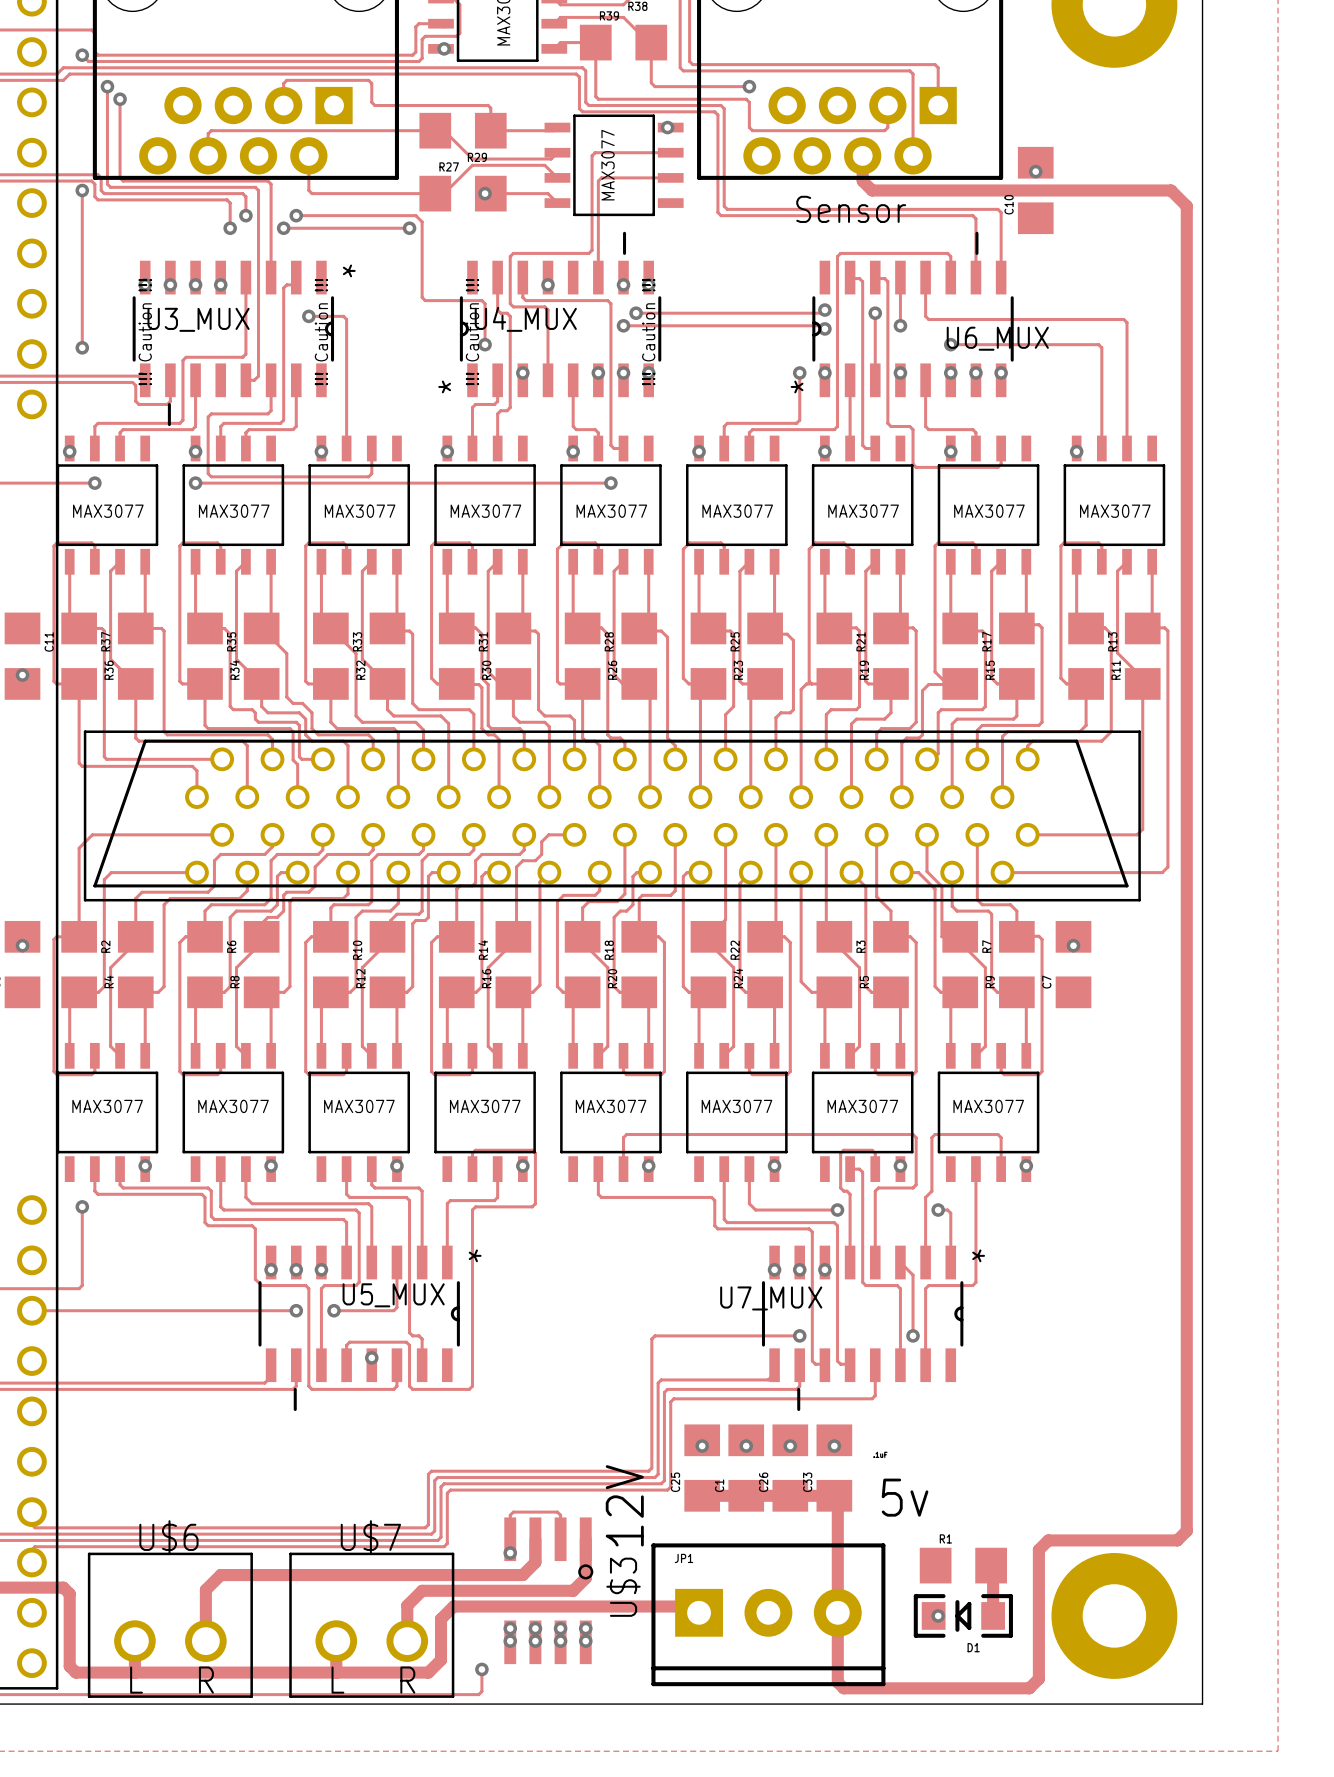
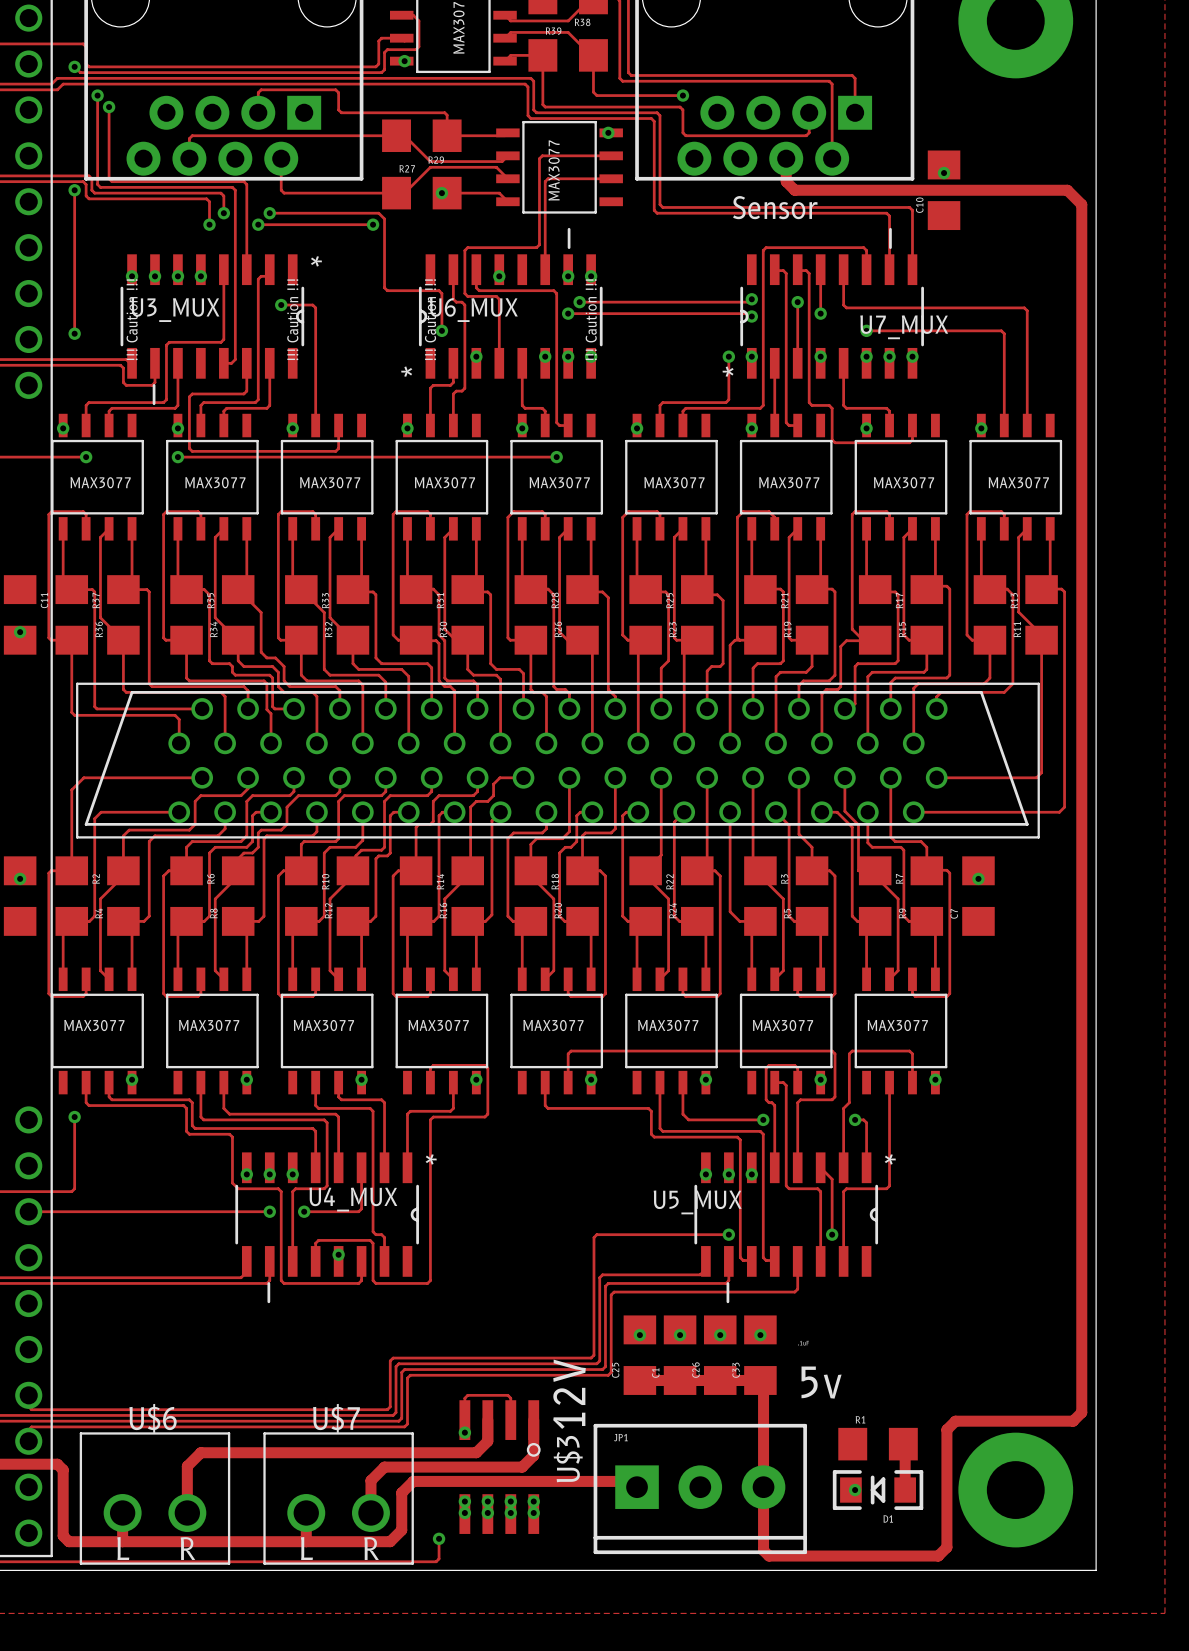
U4_MUX name: U4_MUX (525, 319) -> U6_MUX (473, 310)
U6_MUX name: U6_MUX (997, 338) -> U7_MUX (904, 327)
U5_MUX name: U5_MUX (393, 1295) -> U4_MUX (353, 1199)
U7_MUX name: U7_MUX (771, 1298) -> U5_MUX (697, 1202)

